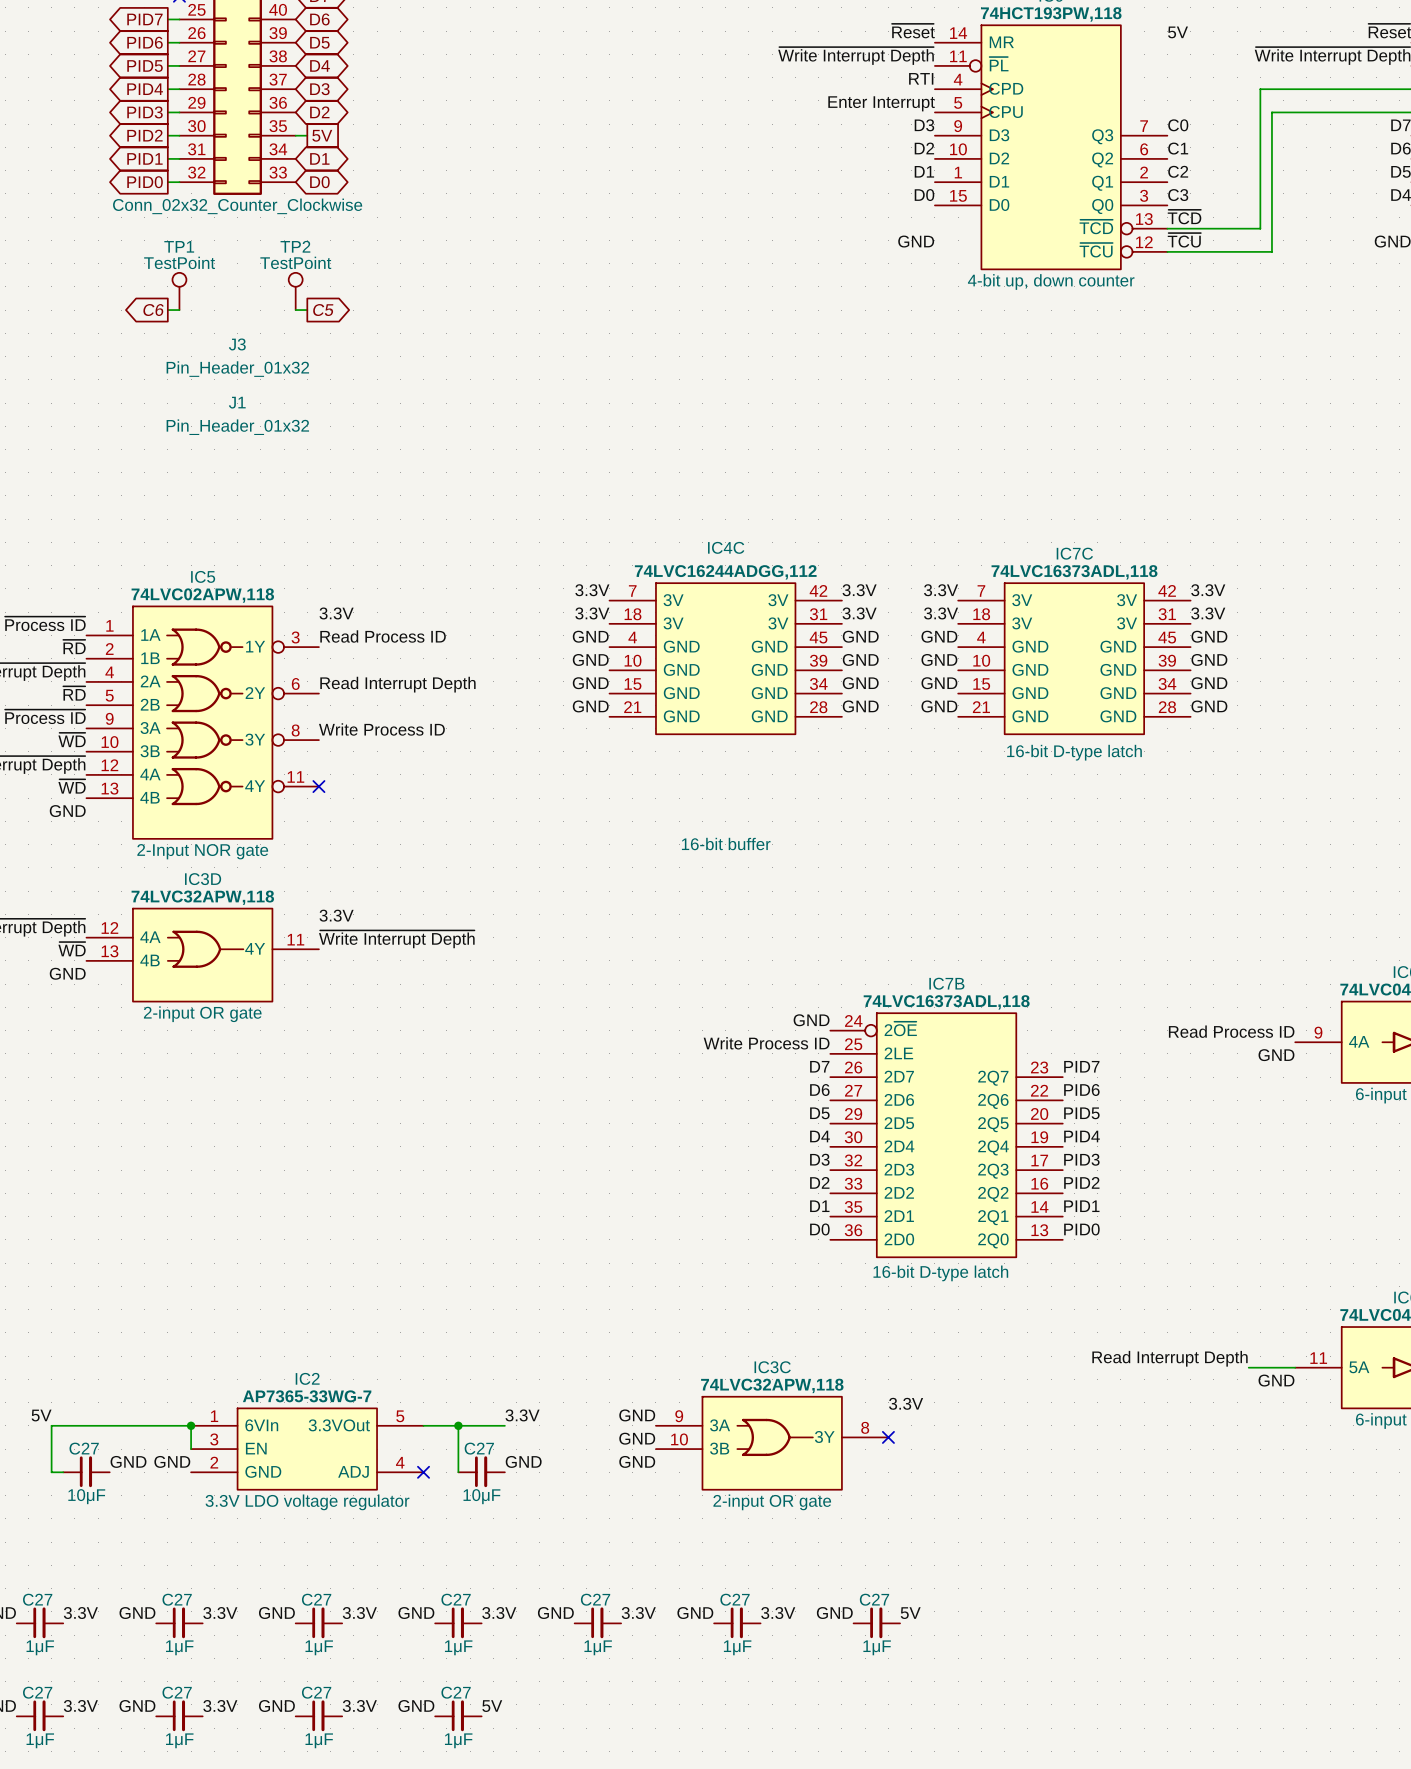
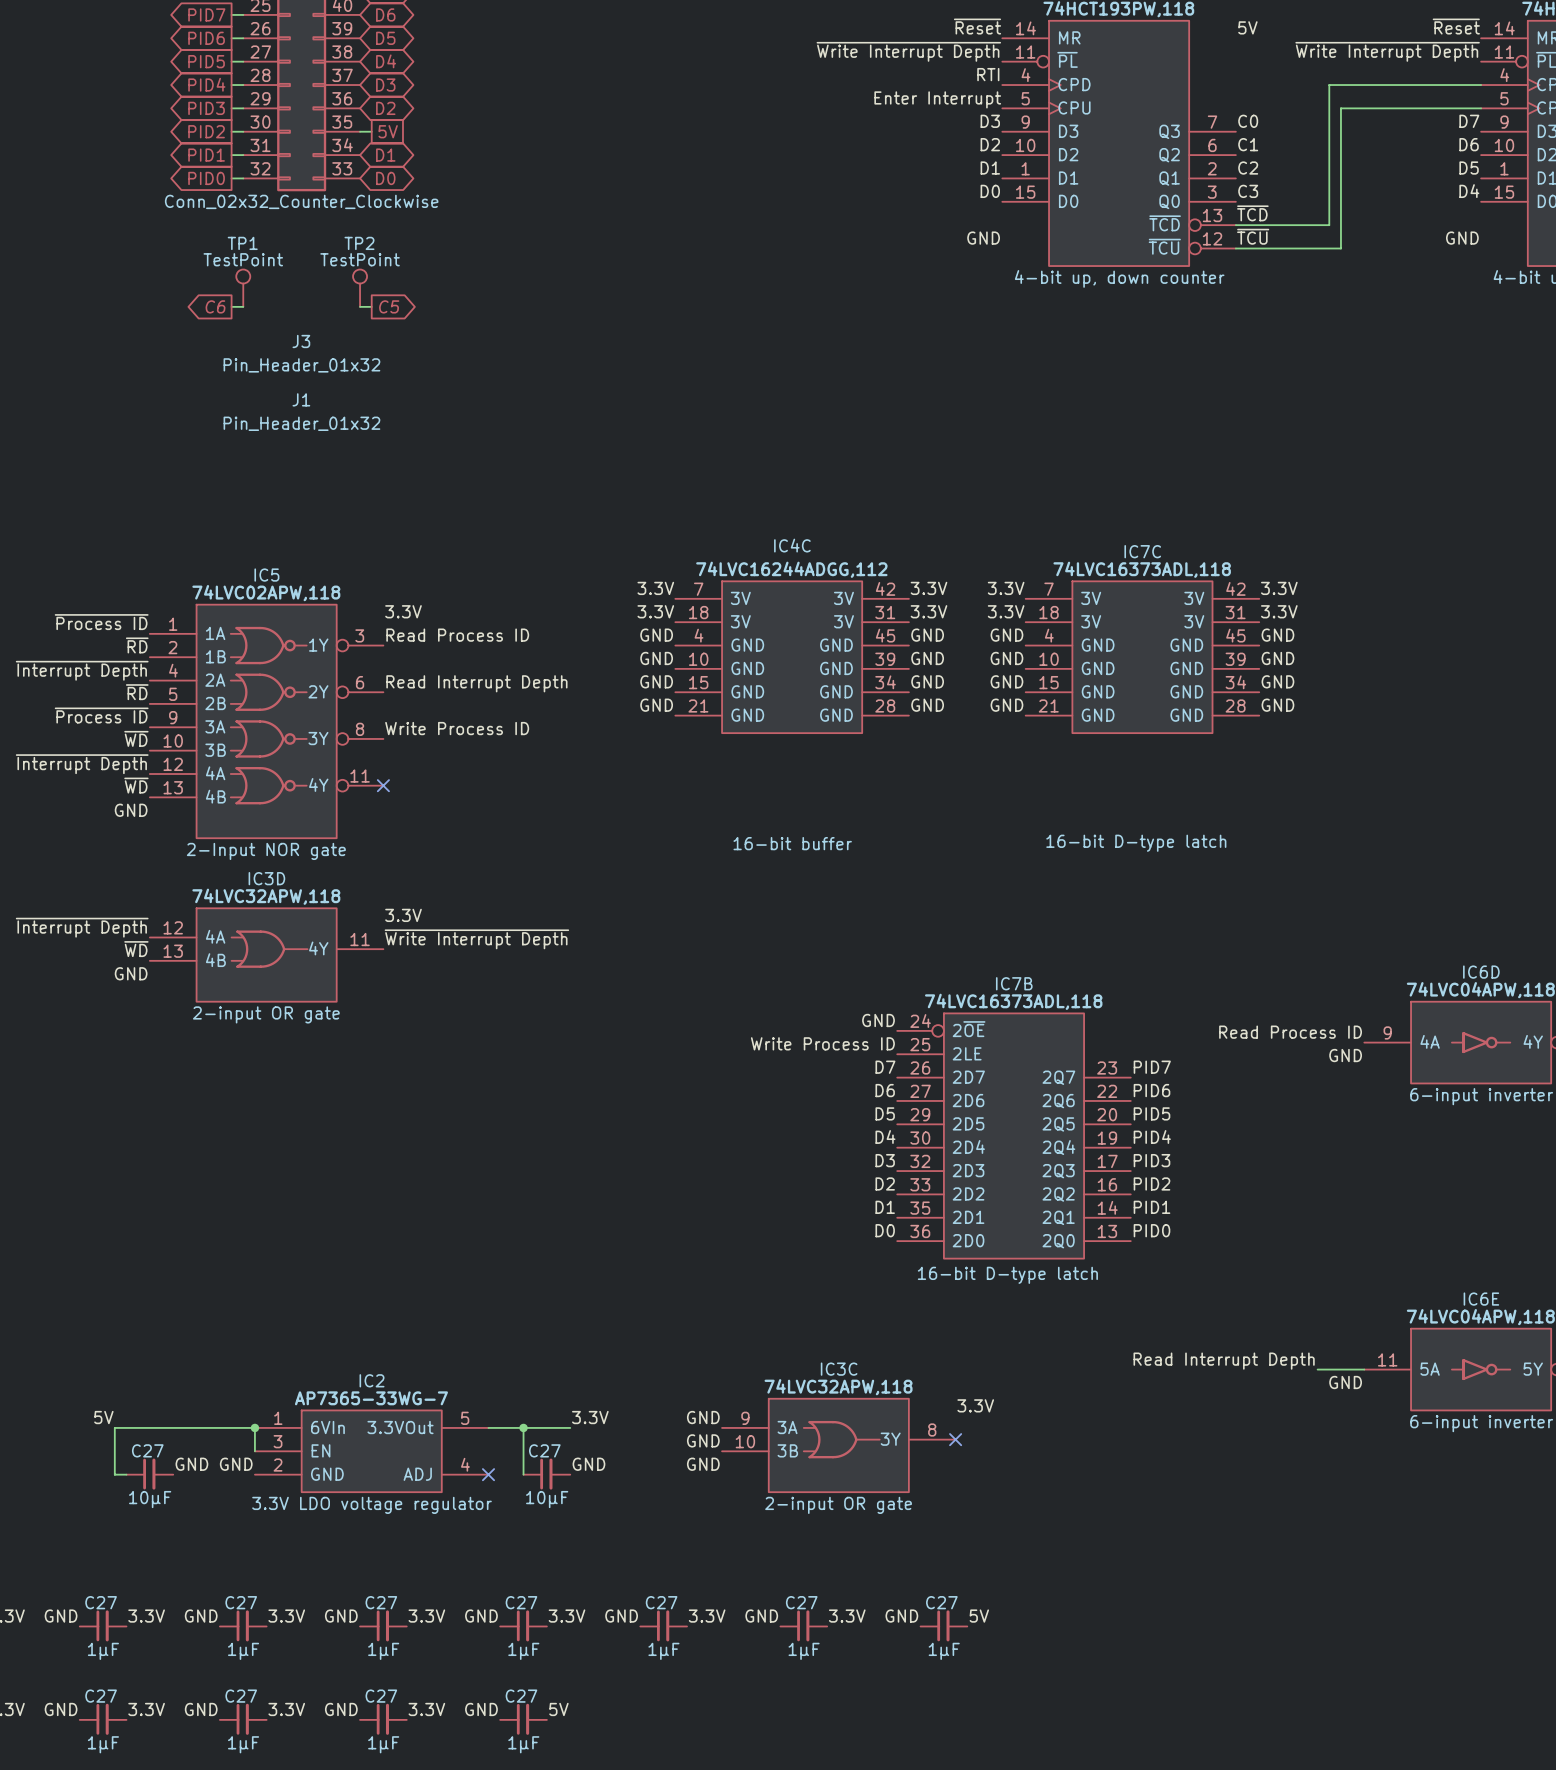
IC7C text position: 16-bit D-type latch (1074, 752) -> 16-bit D-type latch (1136, 843)

